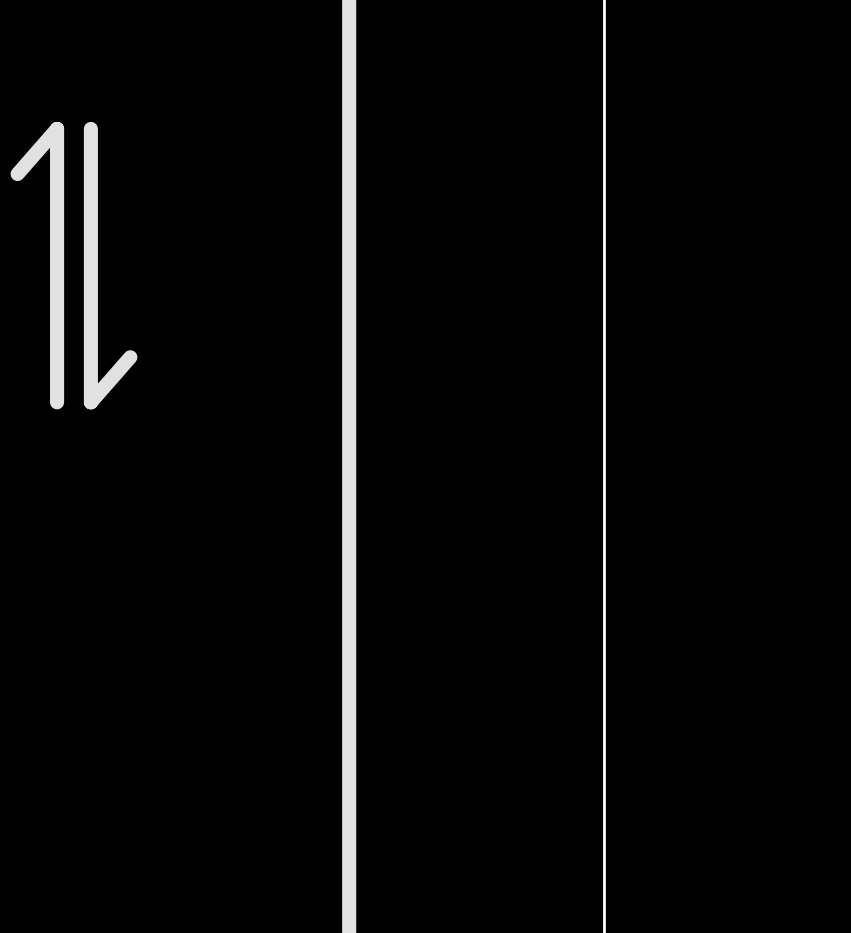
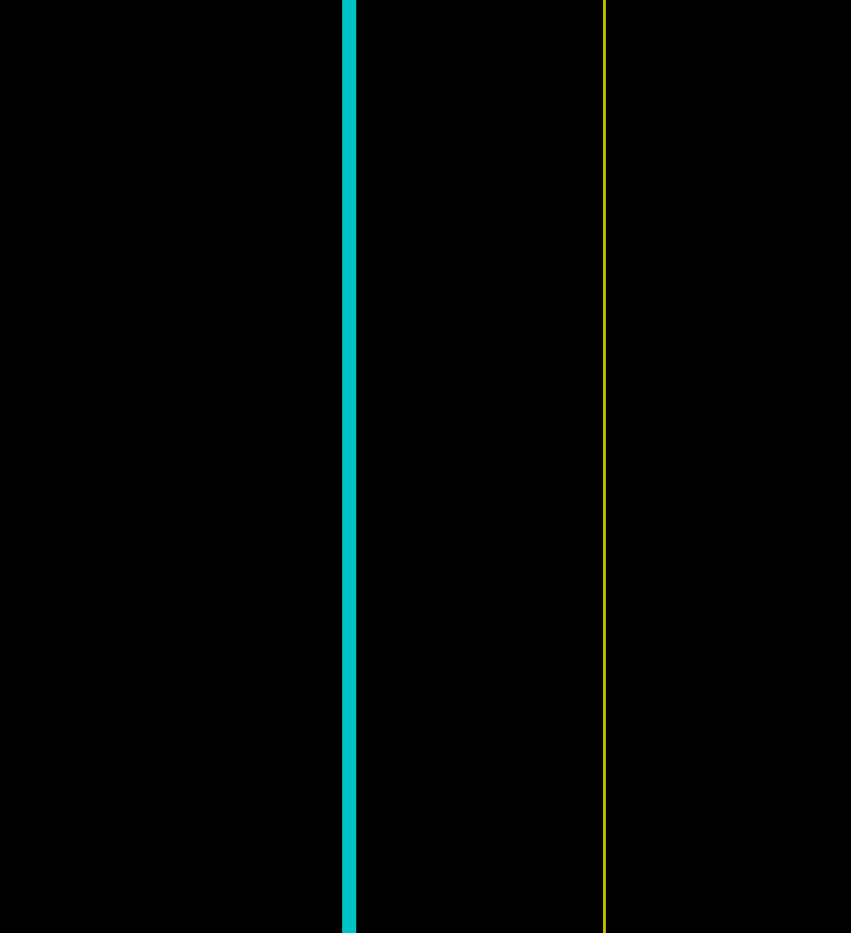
line: (57, 128) (17, 174) (57, 128) -> none
line: (57, 128) (57, 402) -> none
line: (90, 128) (90, 402) -> none
line: (90, 402) (130, 357) (90, 402) -> none

